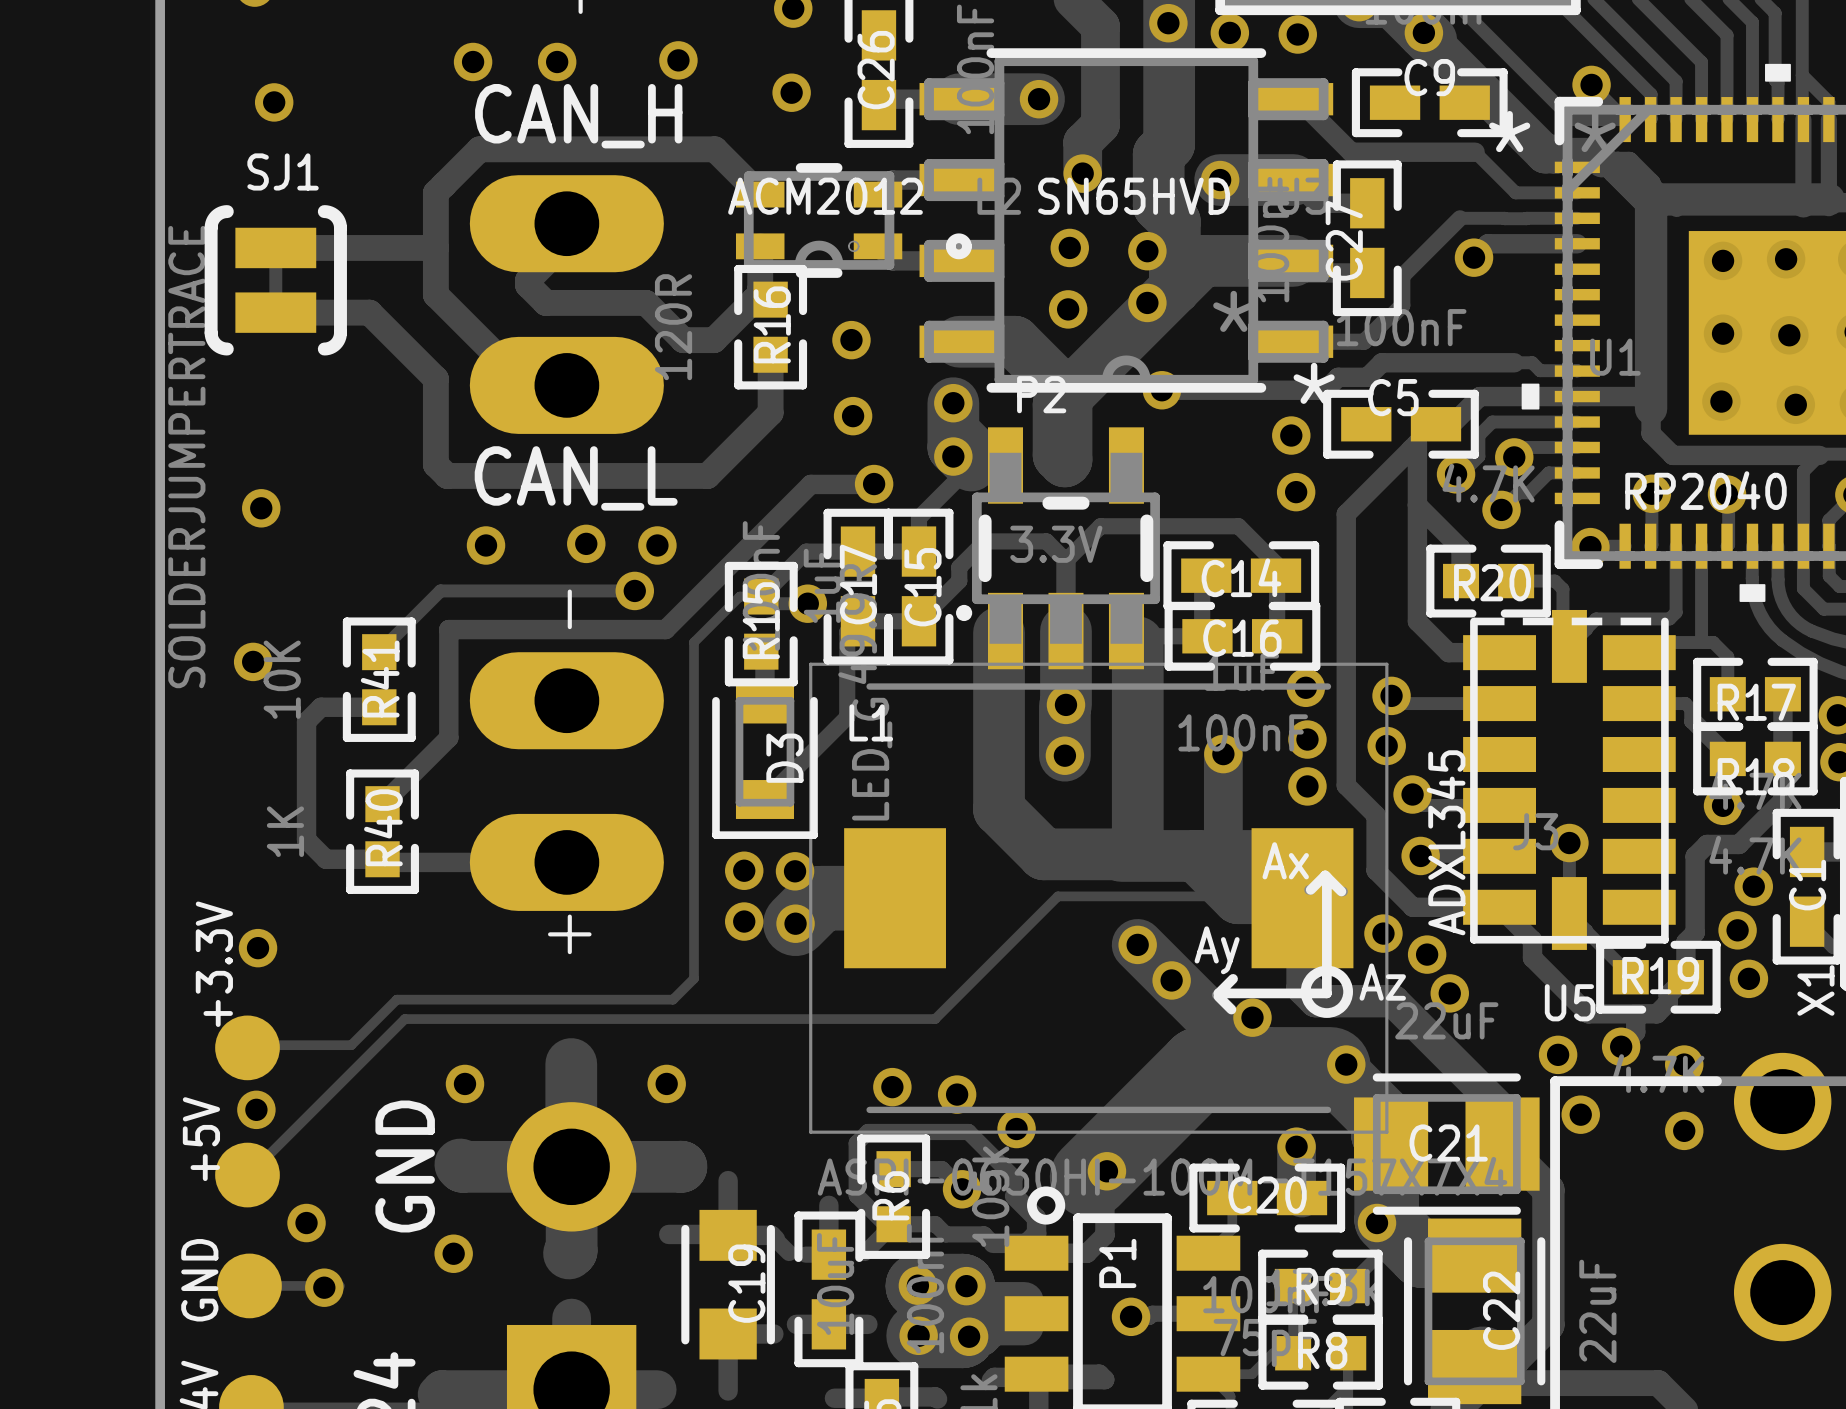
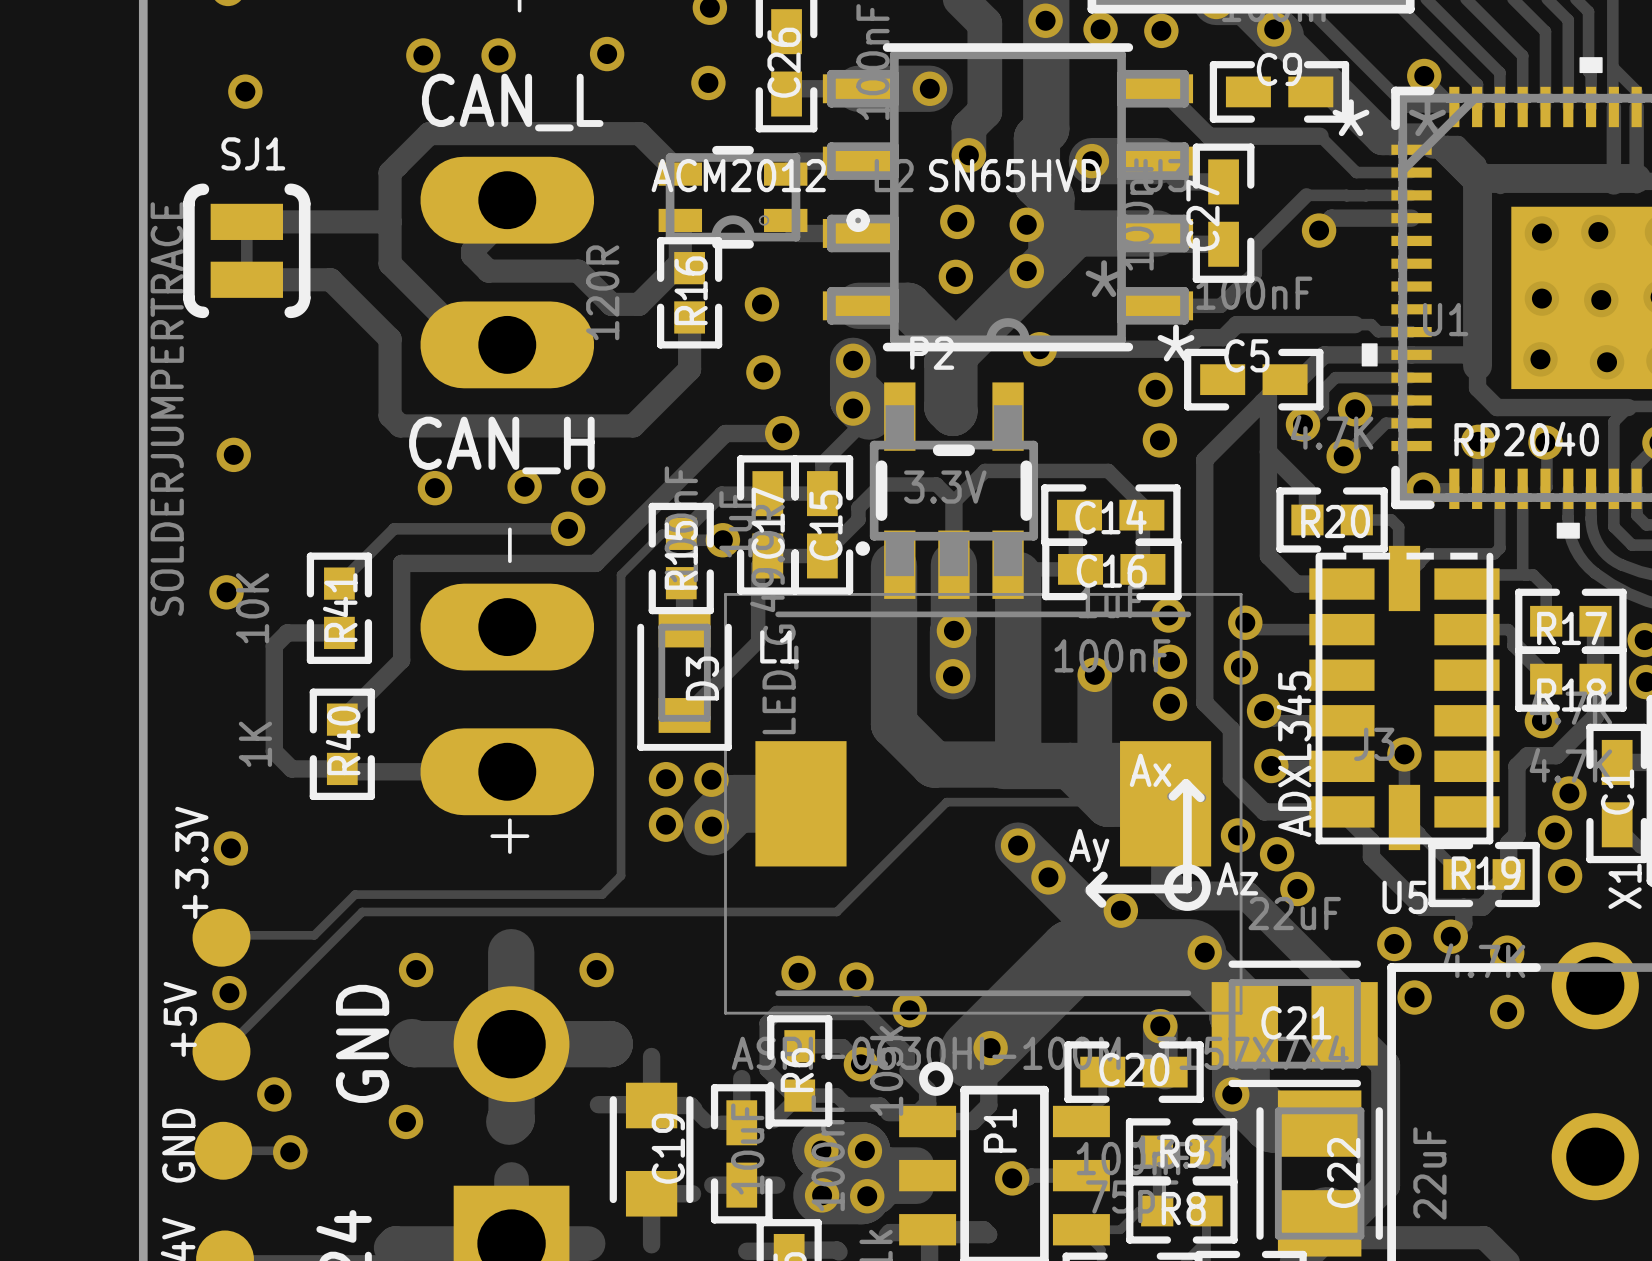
text: CAN_H (578, 116) -> CAN_L (512, 102)
text: CAN_L (576, 478) -> CAN_H (501, 445)

